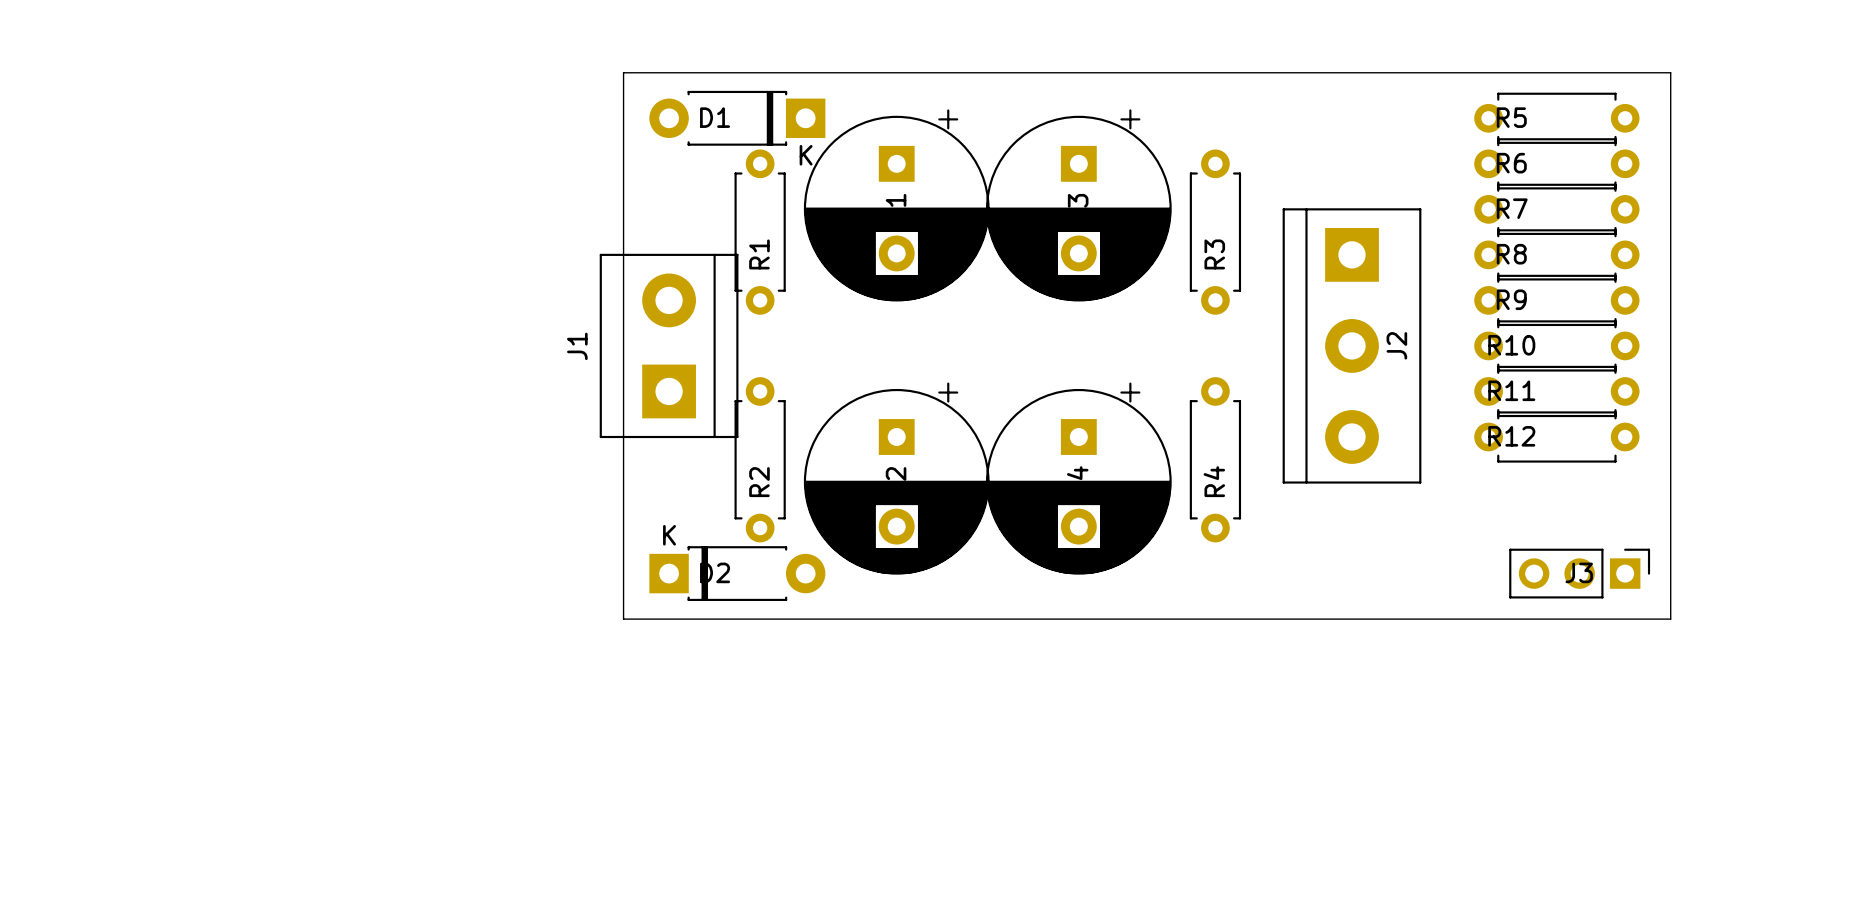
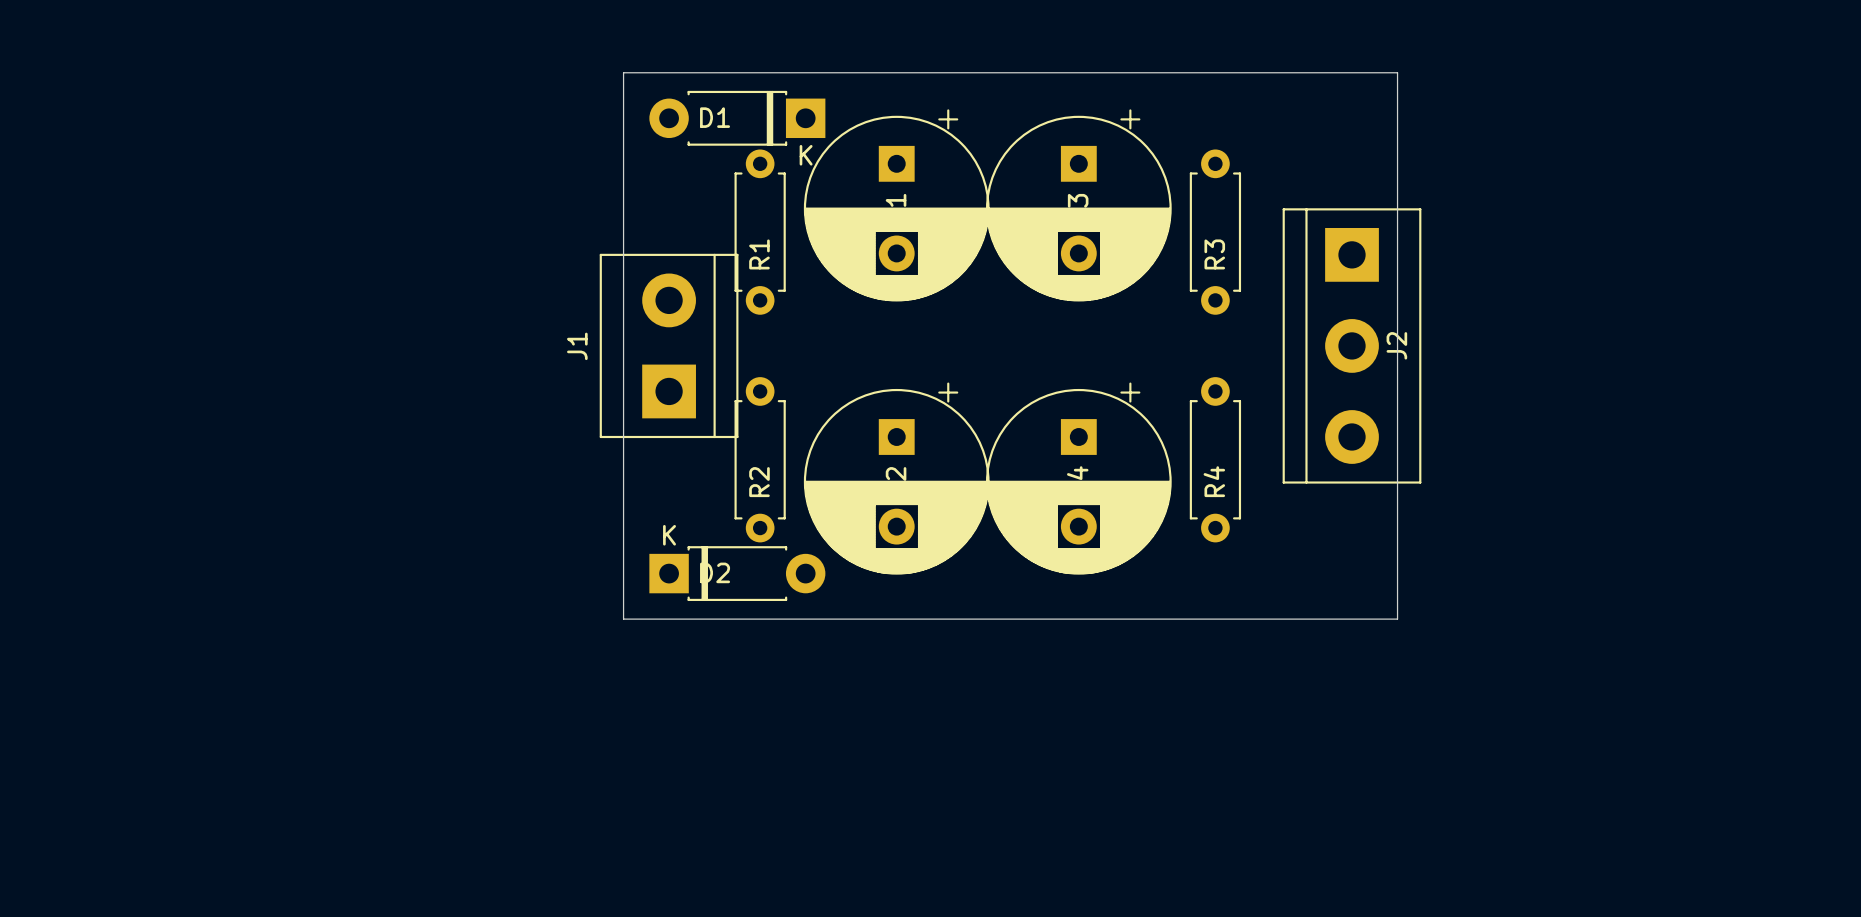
board edge: (1397, 72) (1670, 72) (1670, 619) (1397, 619) -> (1397, 72) (1397, 619)
R5: (1556, 118) -> none
R6: (1556, 163) -> none
R7: (1556, 209) -> none
R8: (1556, 254) -> none
R9: (1556, 300) -> none
R10: (1556, 345) -> none
R11: (1556, 391) -> none
R12: (1556, 436) -> none
J3: (1579, 573) -> none

